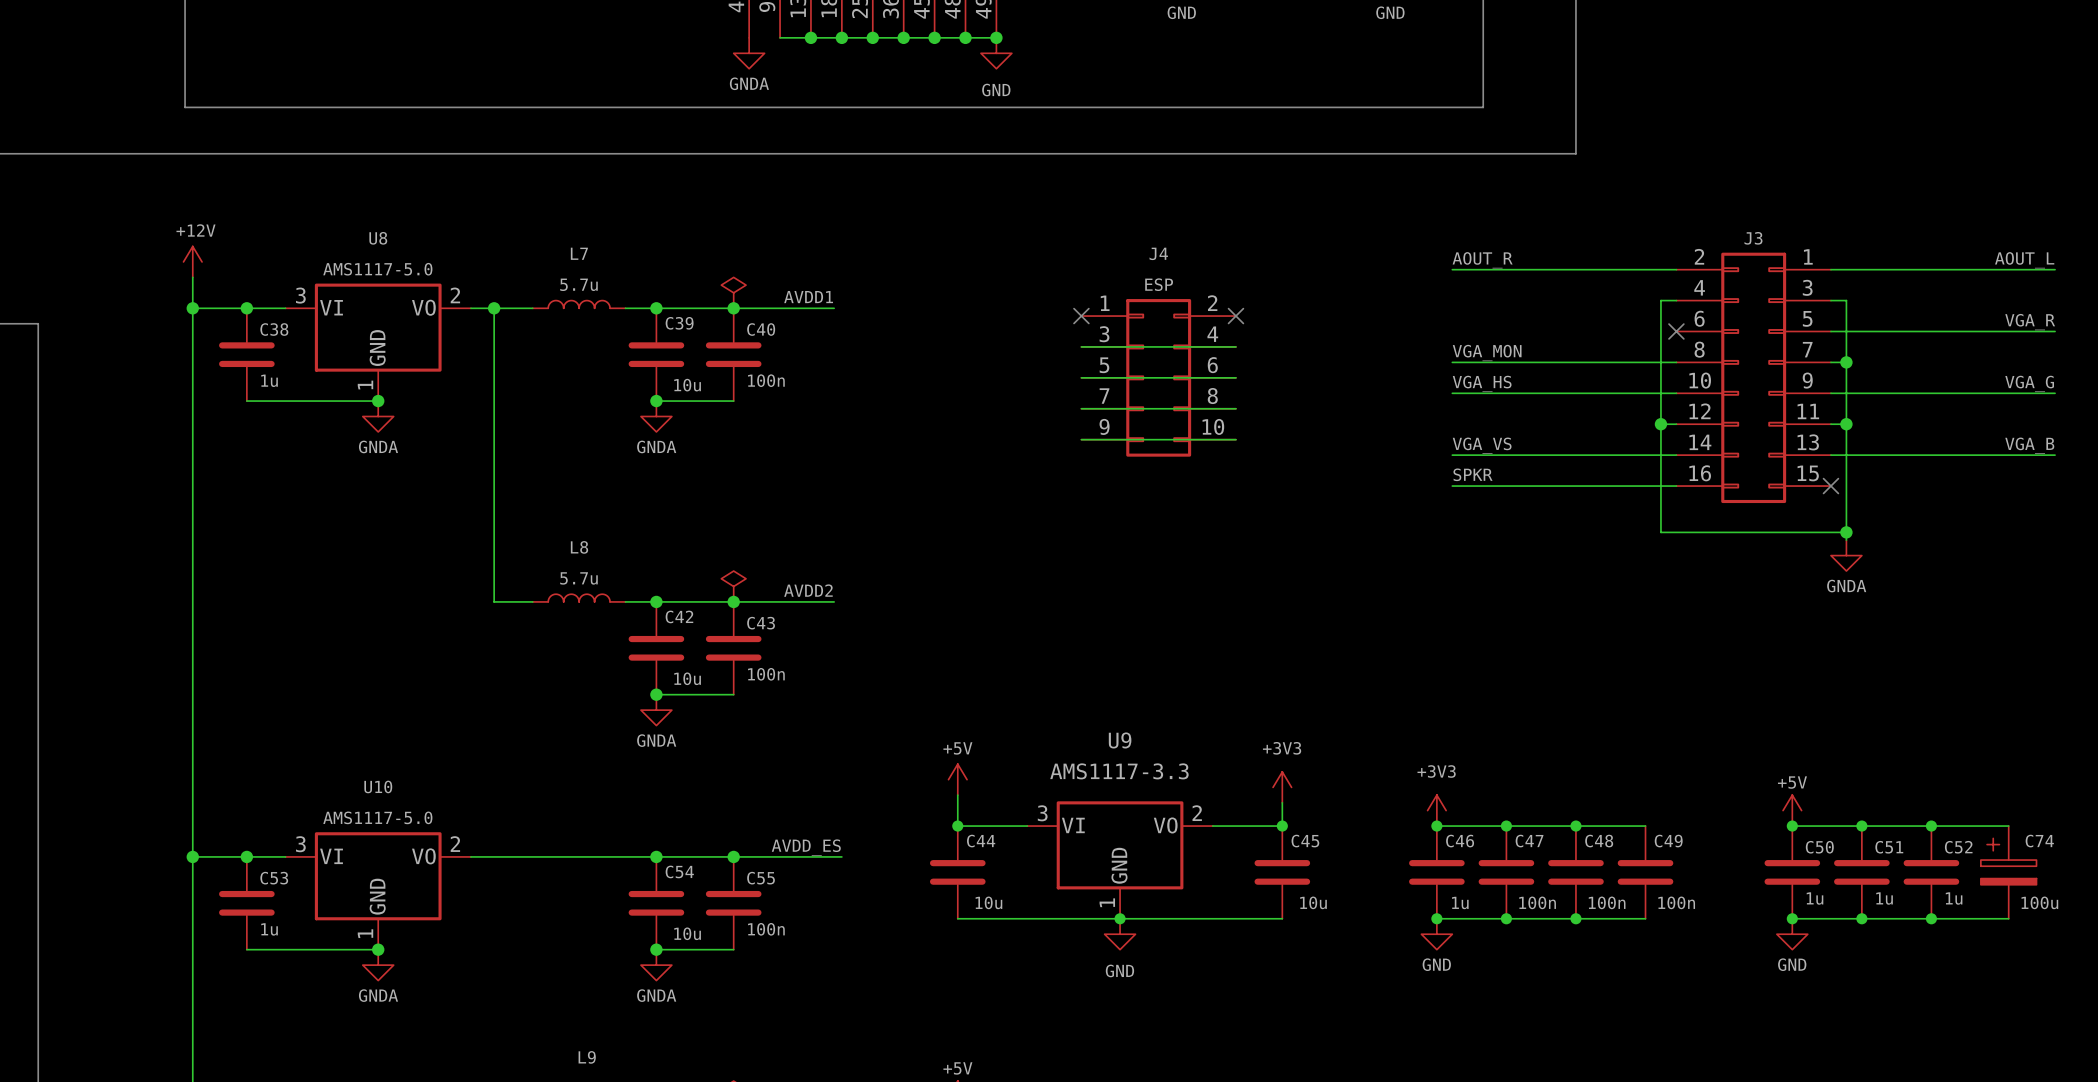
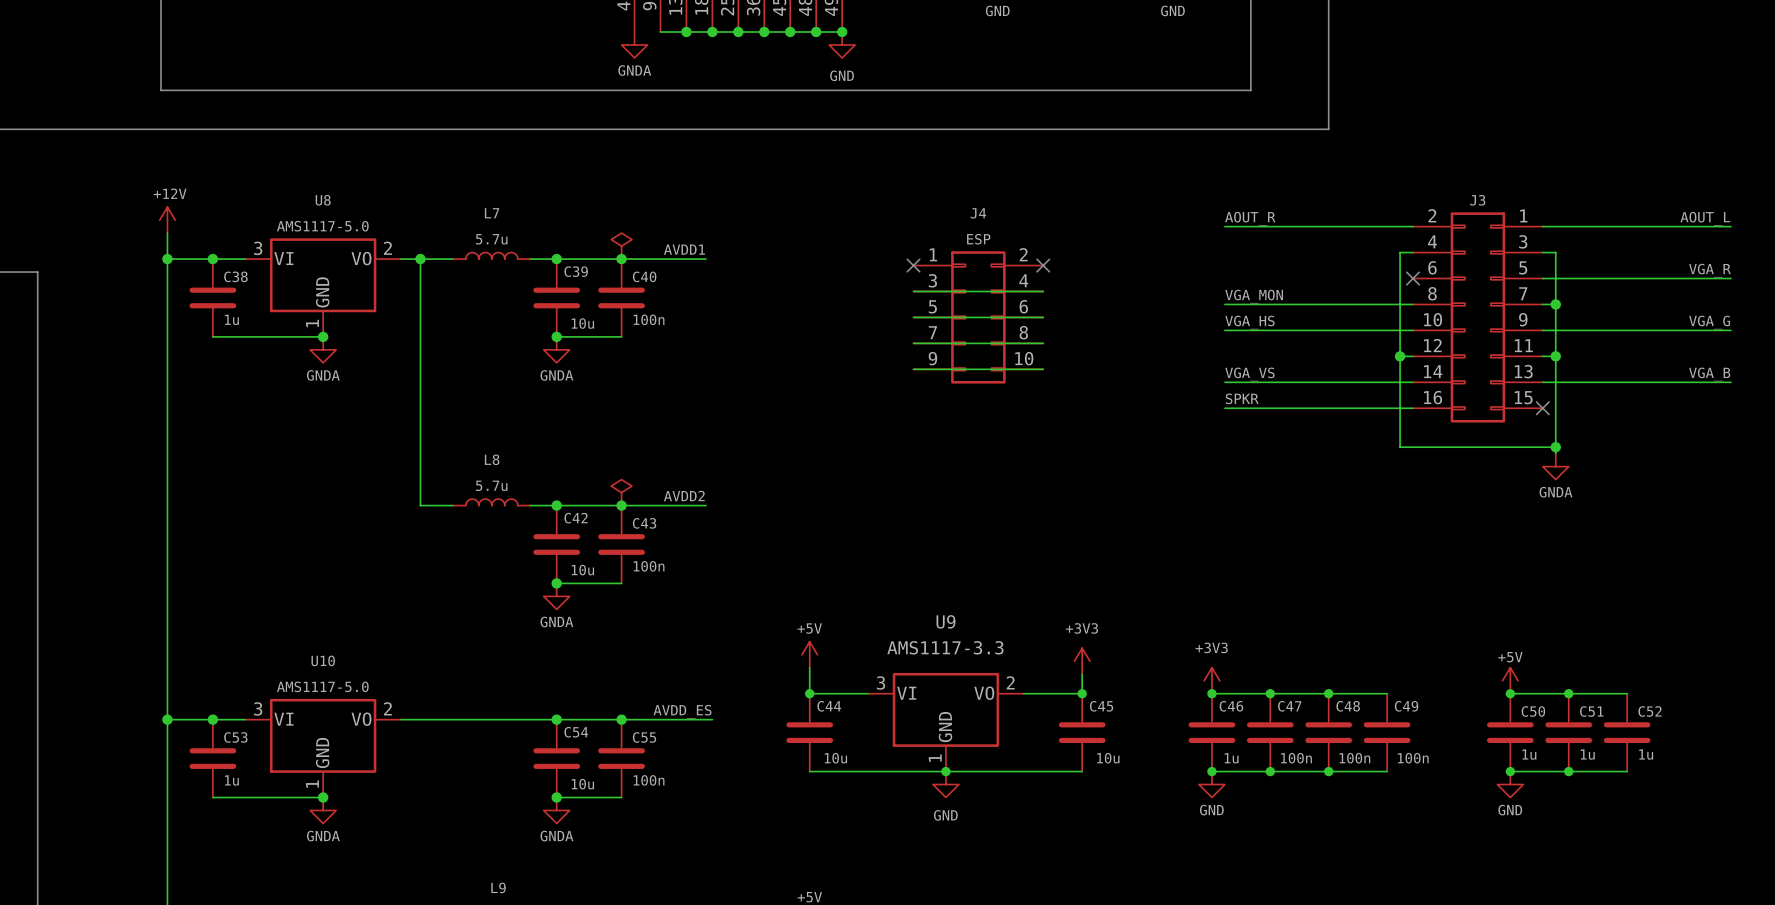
wire: (1931, 826) (2008, 826) -> none
junction: (1931, 826) -> none
C74: 100u (2008, 872) -> none
wire: (1931, 918) (2008, 918) -> none
junction: (1931, 918) -> none

